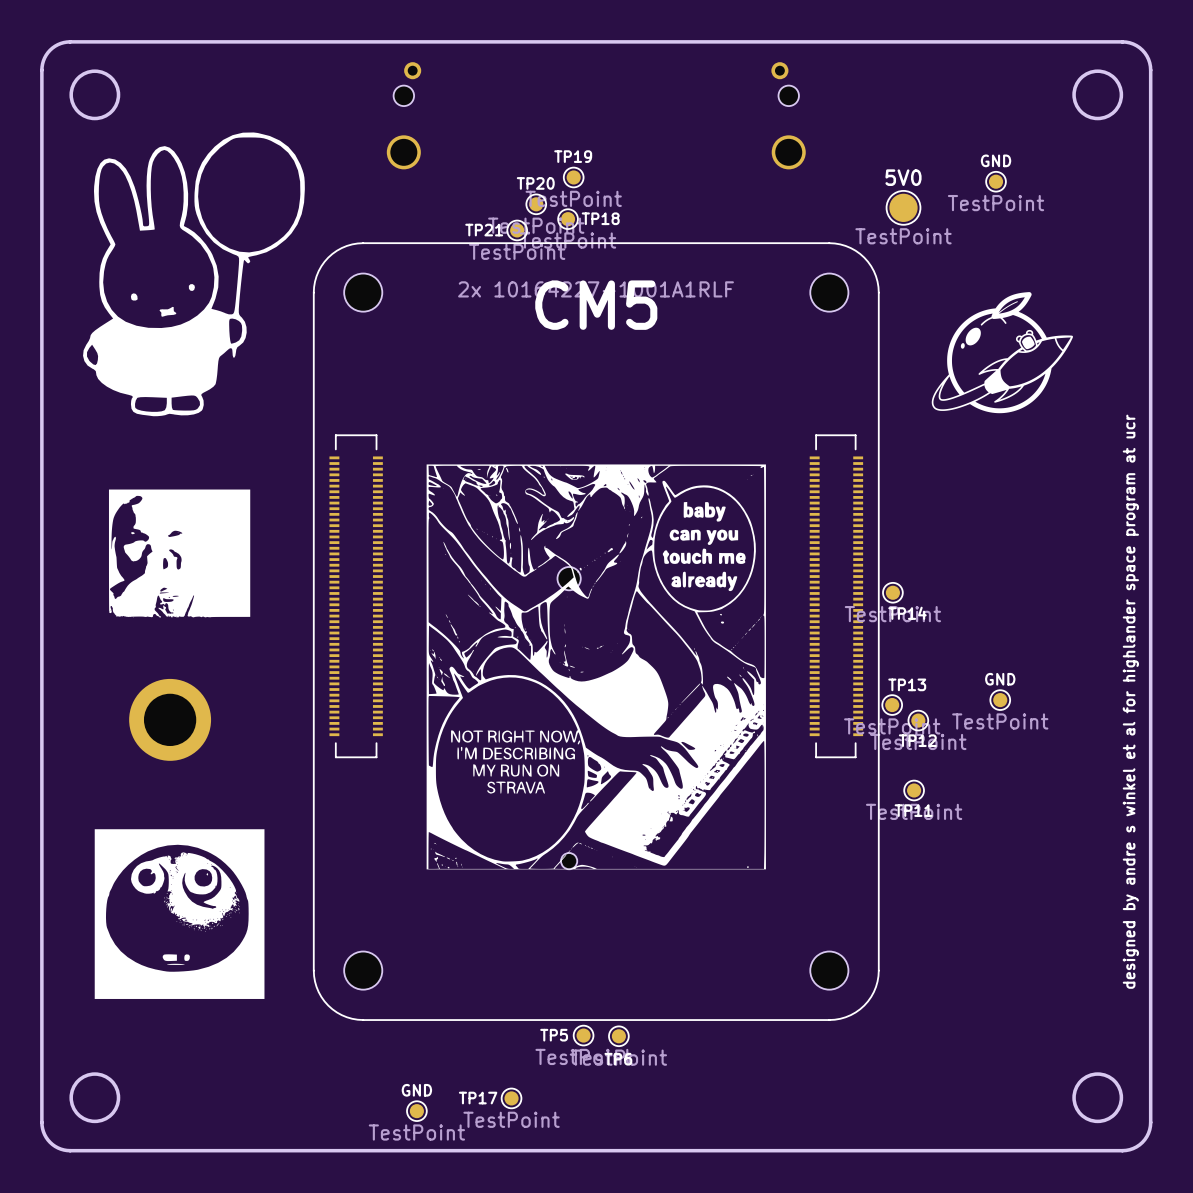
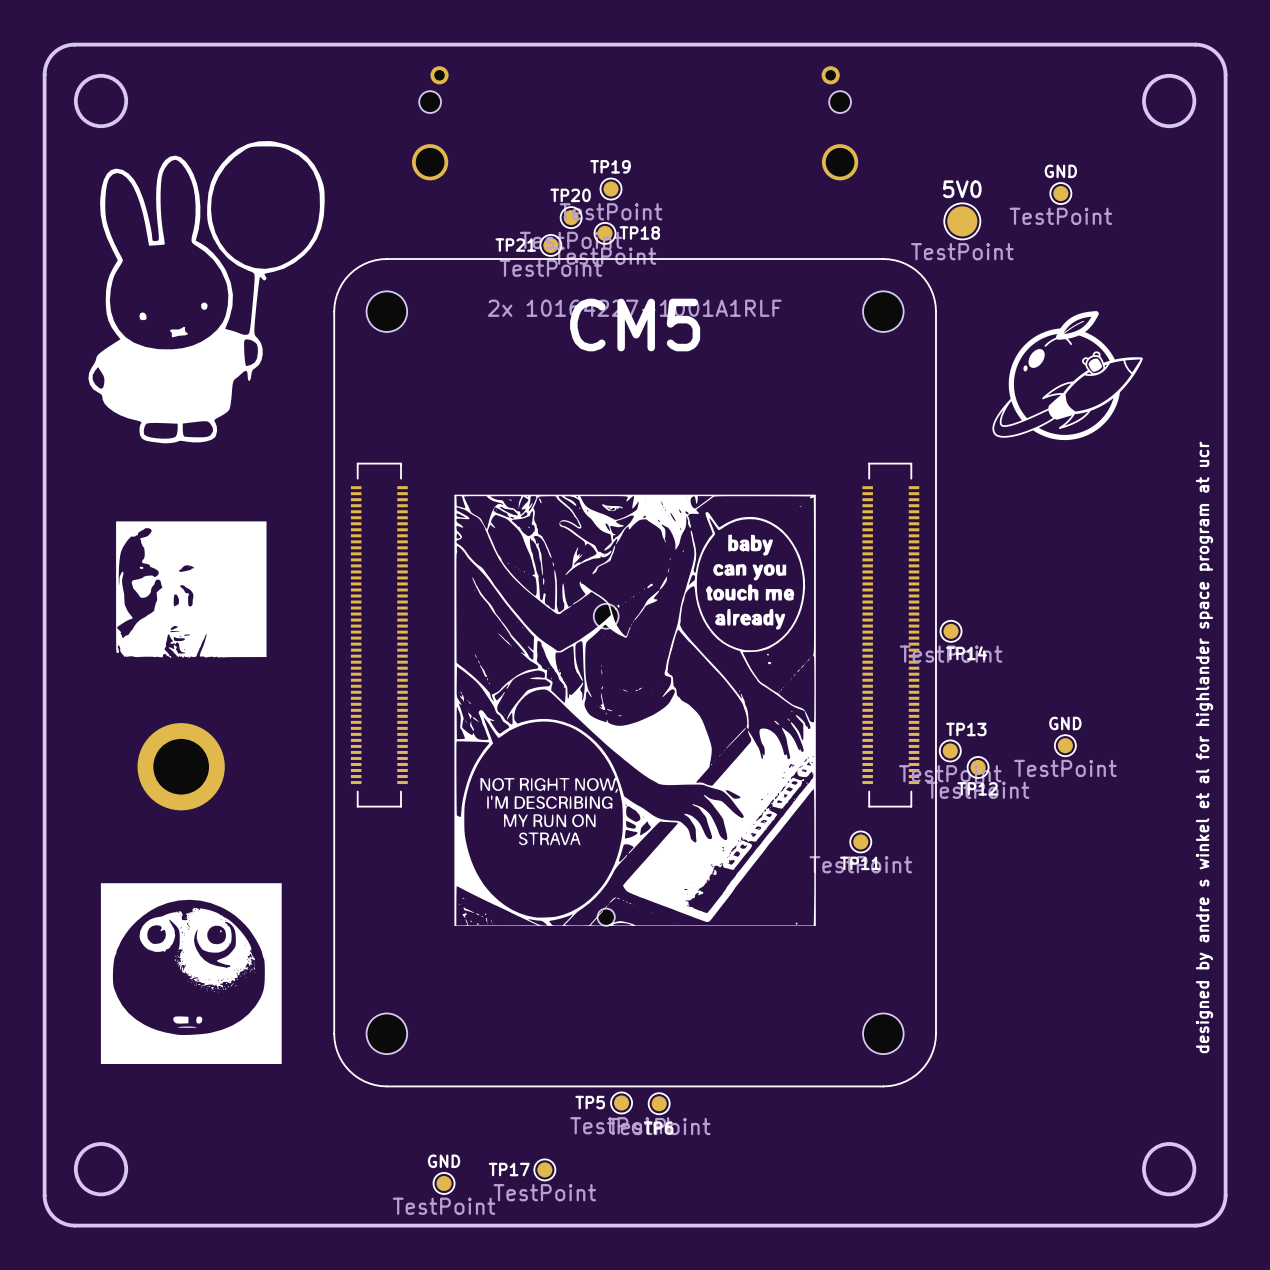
TP11 position: (914, 790) -> (860, 841)

